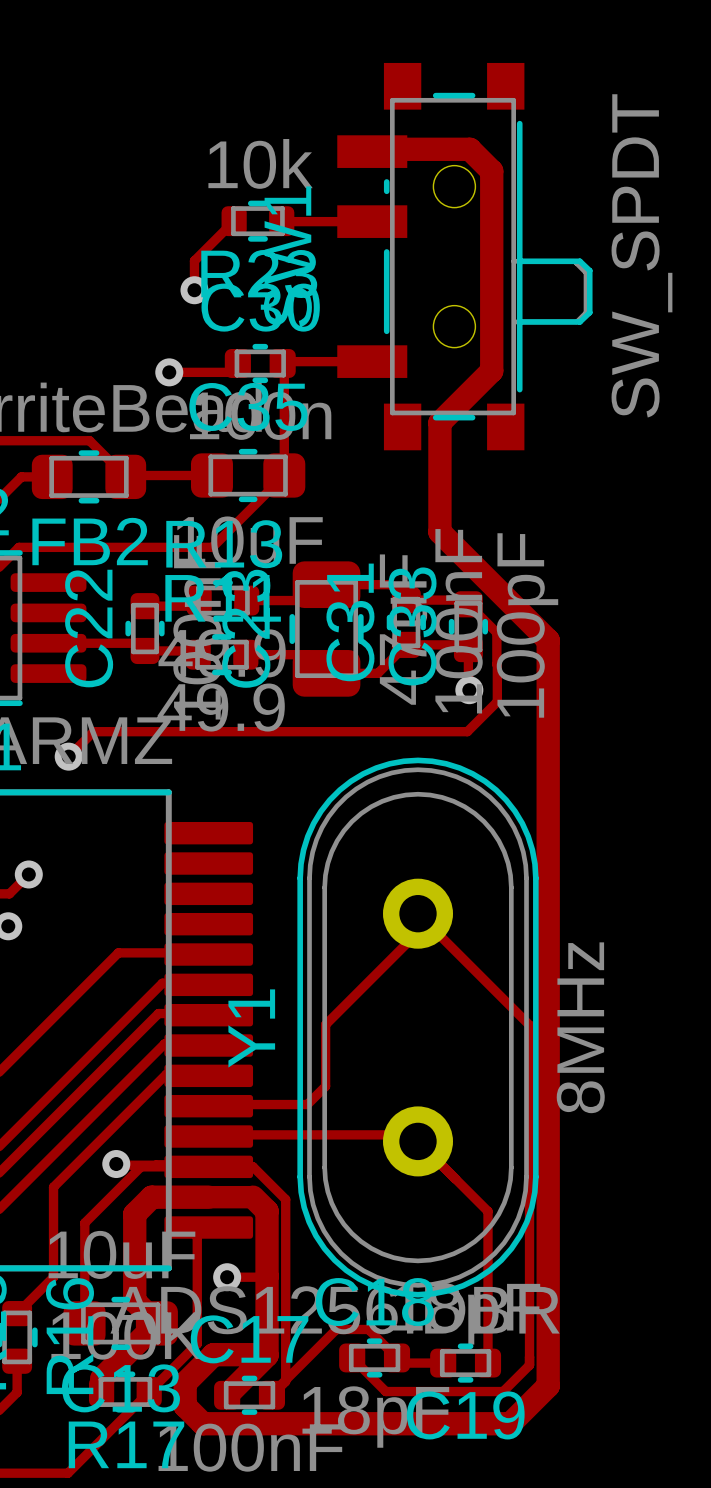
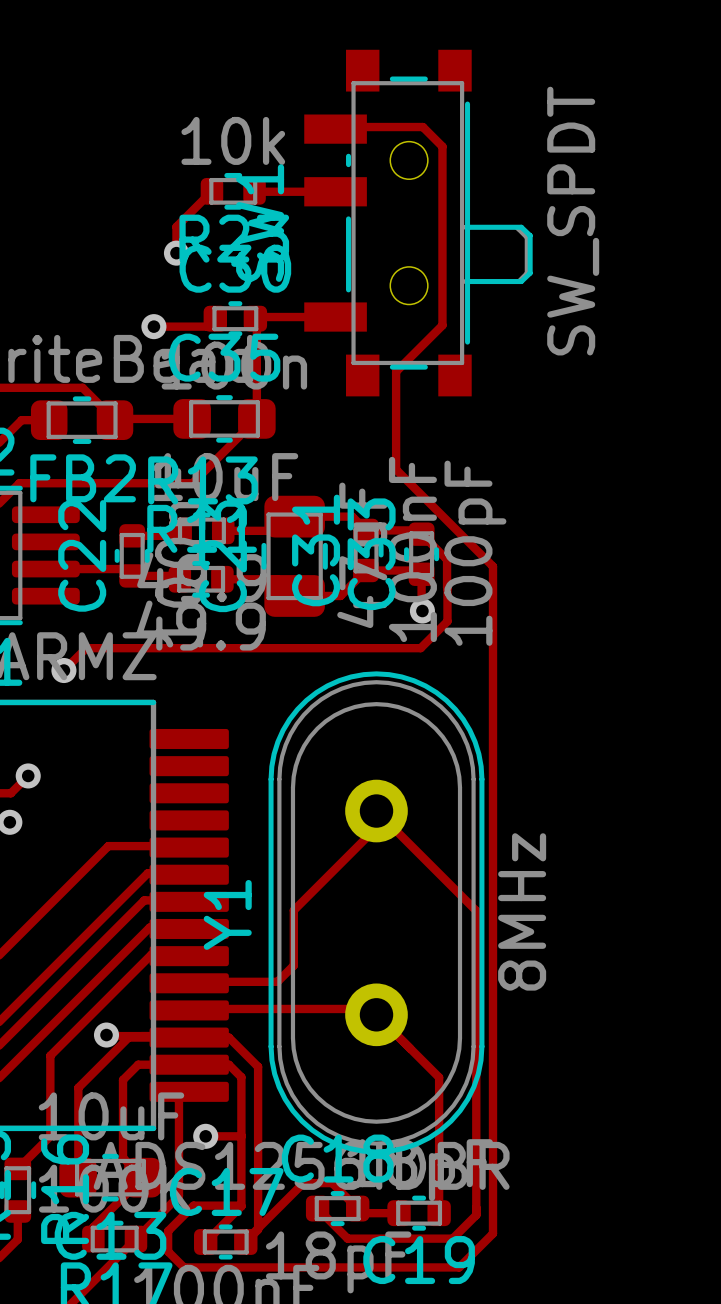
track width: thick (374, 149) (469, 149) (491, 171) (491, 370) (439, 422) (439, 532) (548, 640) (548, 1385) (510, 1423) (202, 1423) (185, 1406) (185, 1383) (213, 1354) (266, 1354) -> thin (337, 127) (422, 127) (442, 146) (442, 325) (396, 371) (396, 469) (493, 566) (493, 1233) (459, 1267) (183, 1267) (168, 1251) (168, 1231) (193, 1205) (240, 1205)
track width: thick (208, 1197) (151, 1197) (134, 1214) (134, 1301) (156, 1323) (101, 1378) -> thin (189, 1064) (138, 1064) (123, 1079) (123, 1157) (142, 1177) (93, 1227)
track width: thick (253, 1197) (267, 1211) (267, 1355) (227, 1395) -> thin (228, 1064) (241, 1077) (241, 1206) (205, 1241)

